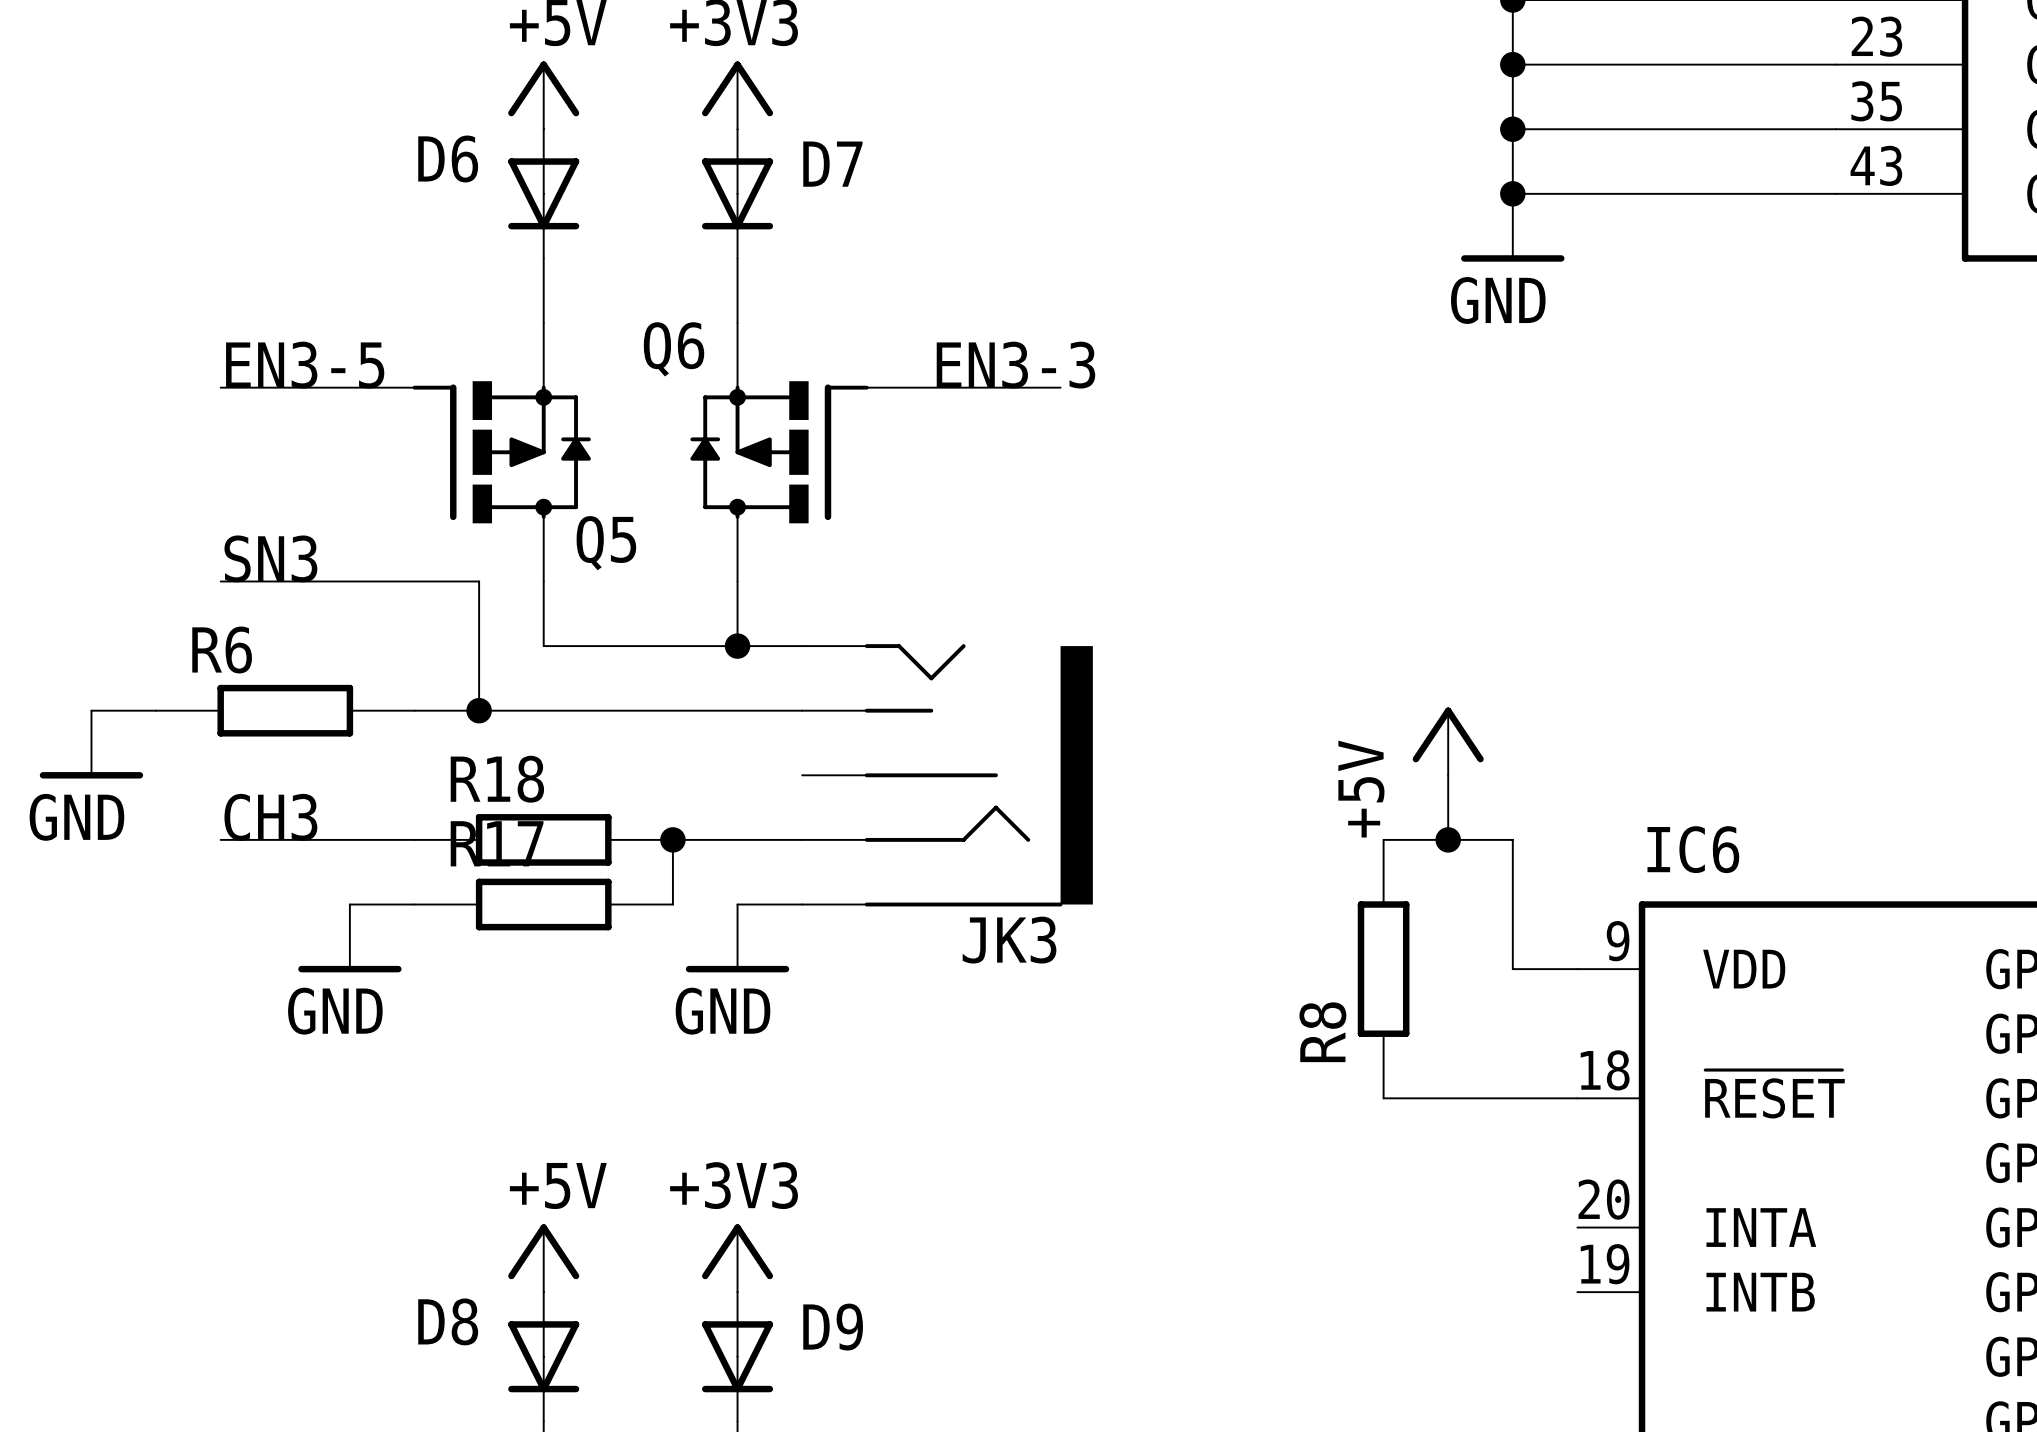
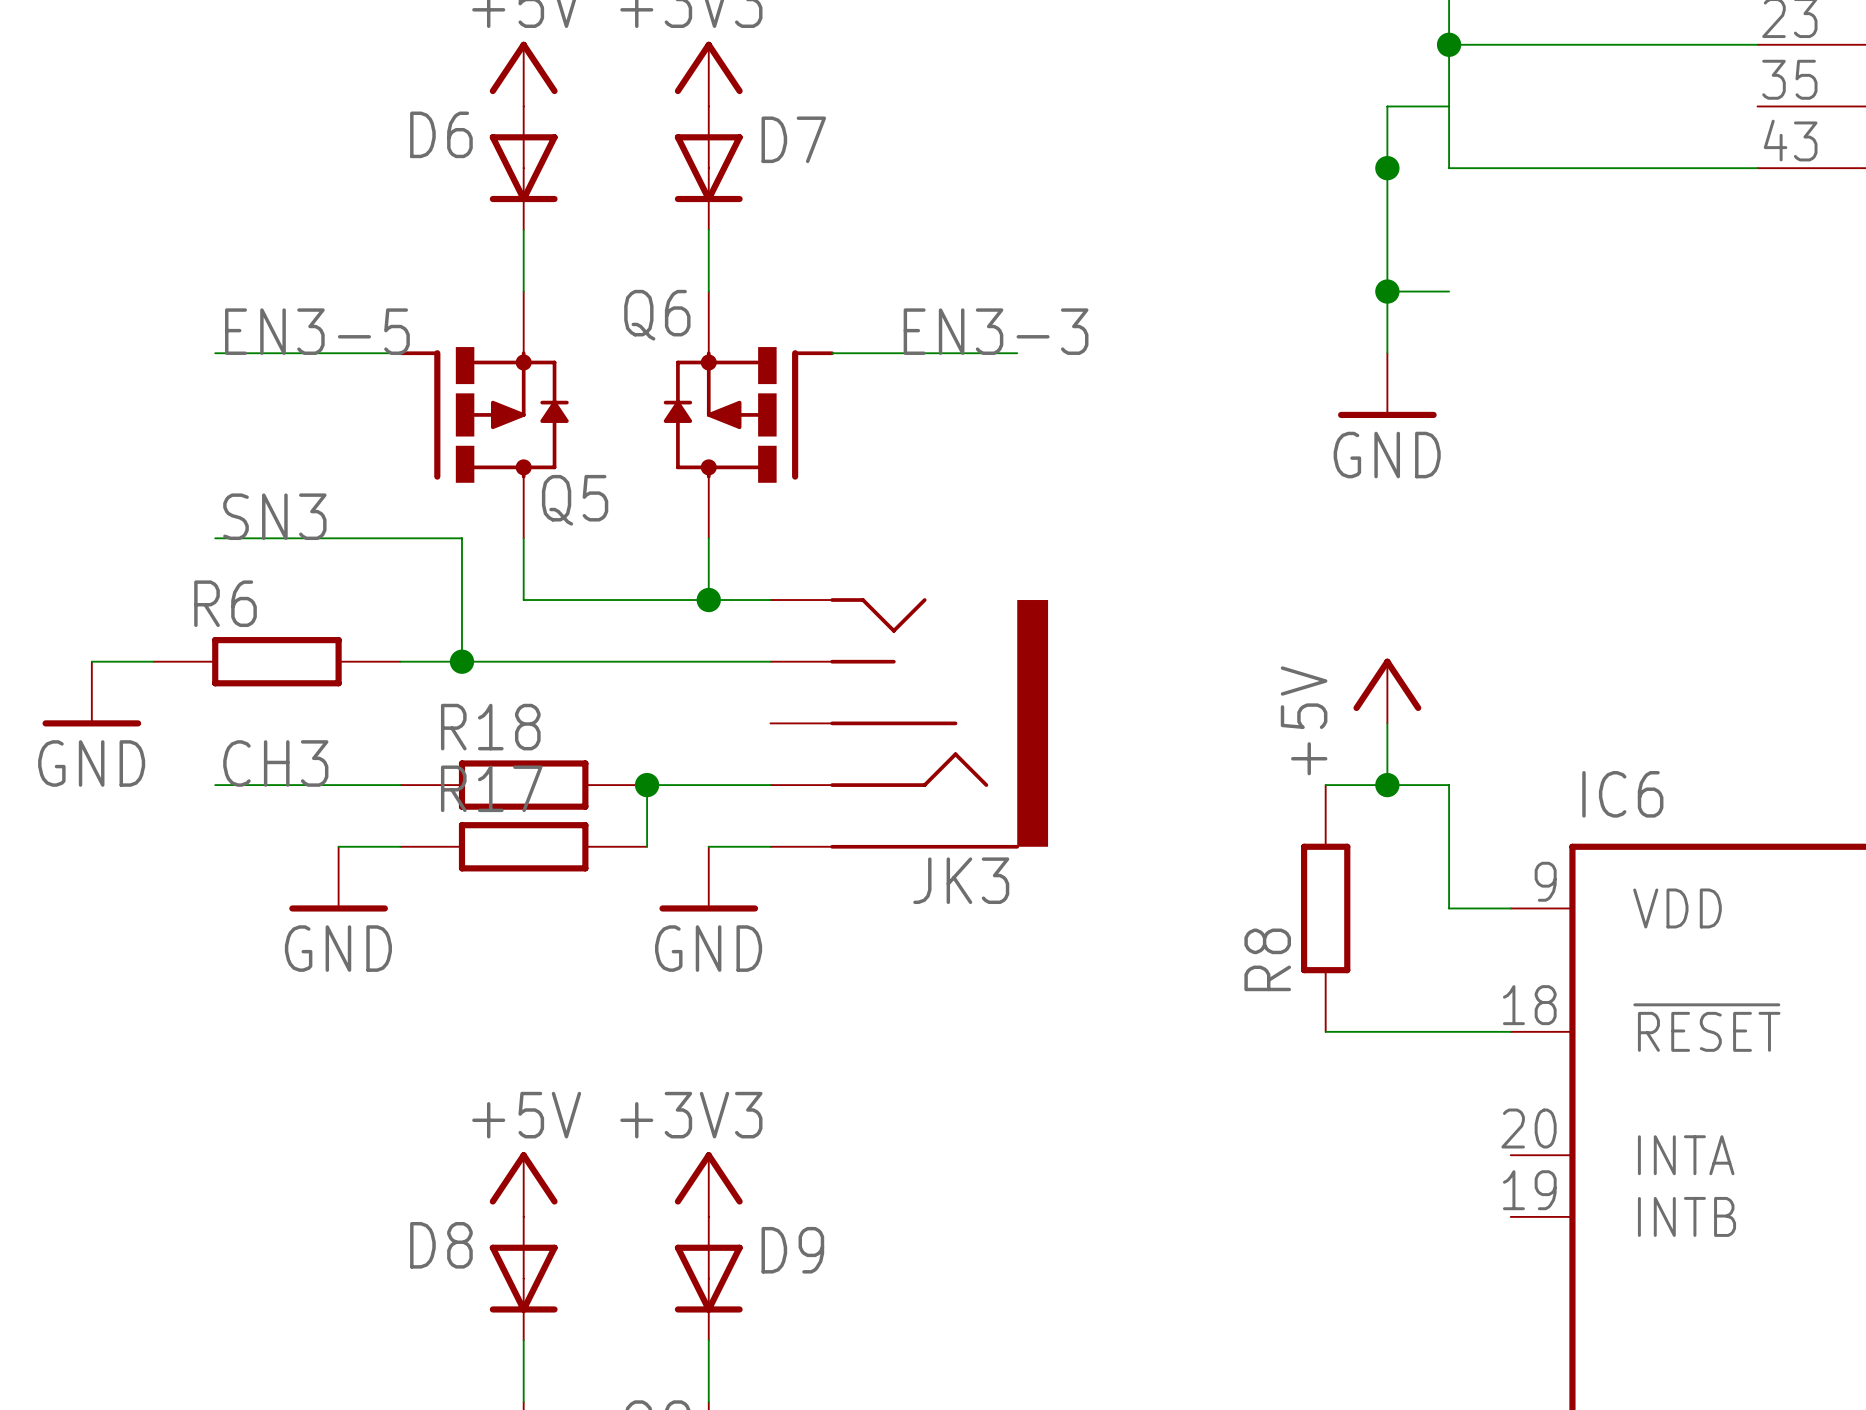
wire: (1512, 129) (1835, 129) -> (1449, 106) (1387, 106) (1387, 353)
junction: (1512, 129) -> none
junction: none -> (1387, 168)
junction: (1512, 193) -> none
power symbol position: GND (1512, 227) -> GND (1387, 385)
wire: none -> (1387, 291) (1449, 291)
junction: none -> (1387, 291)

